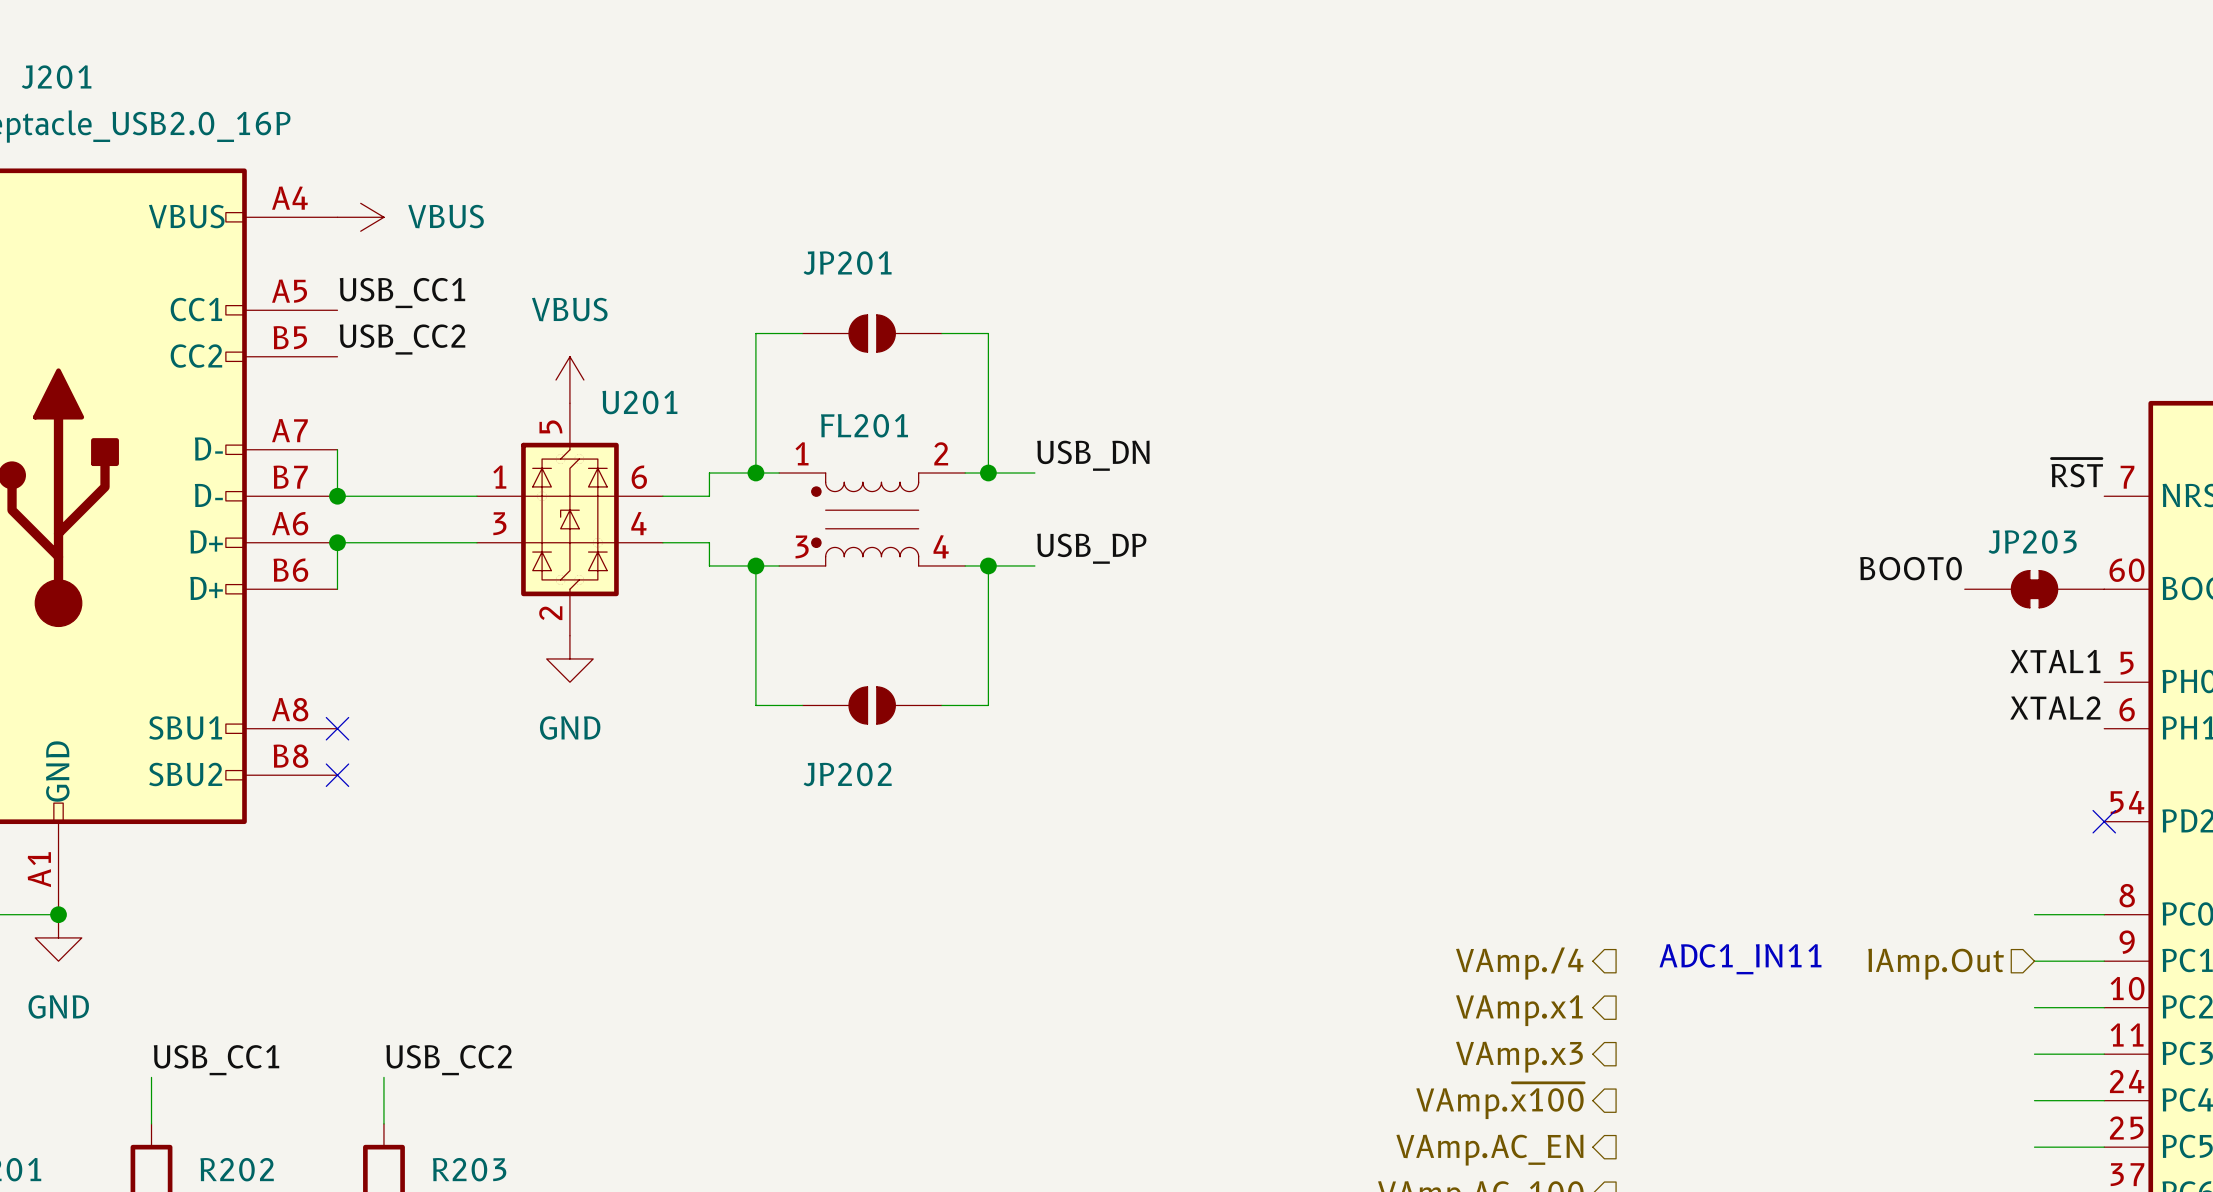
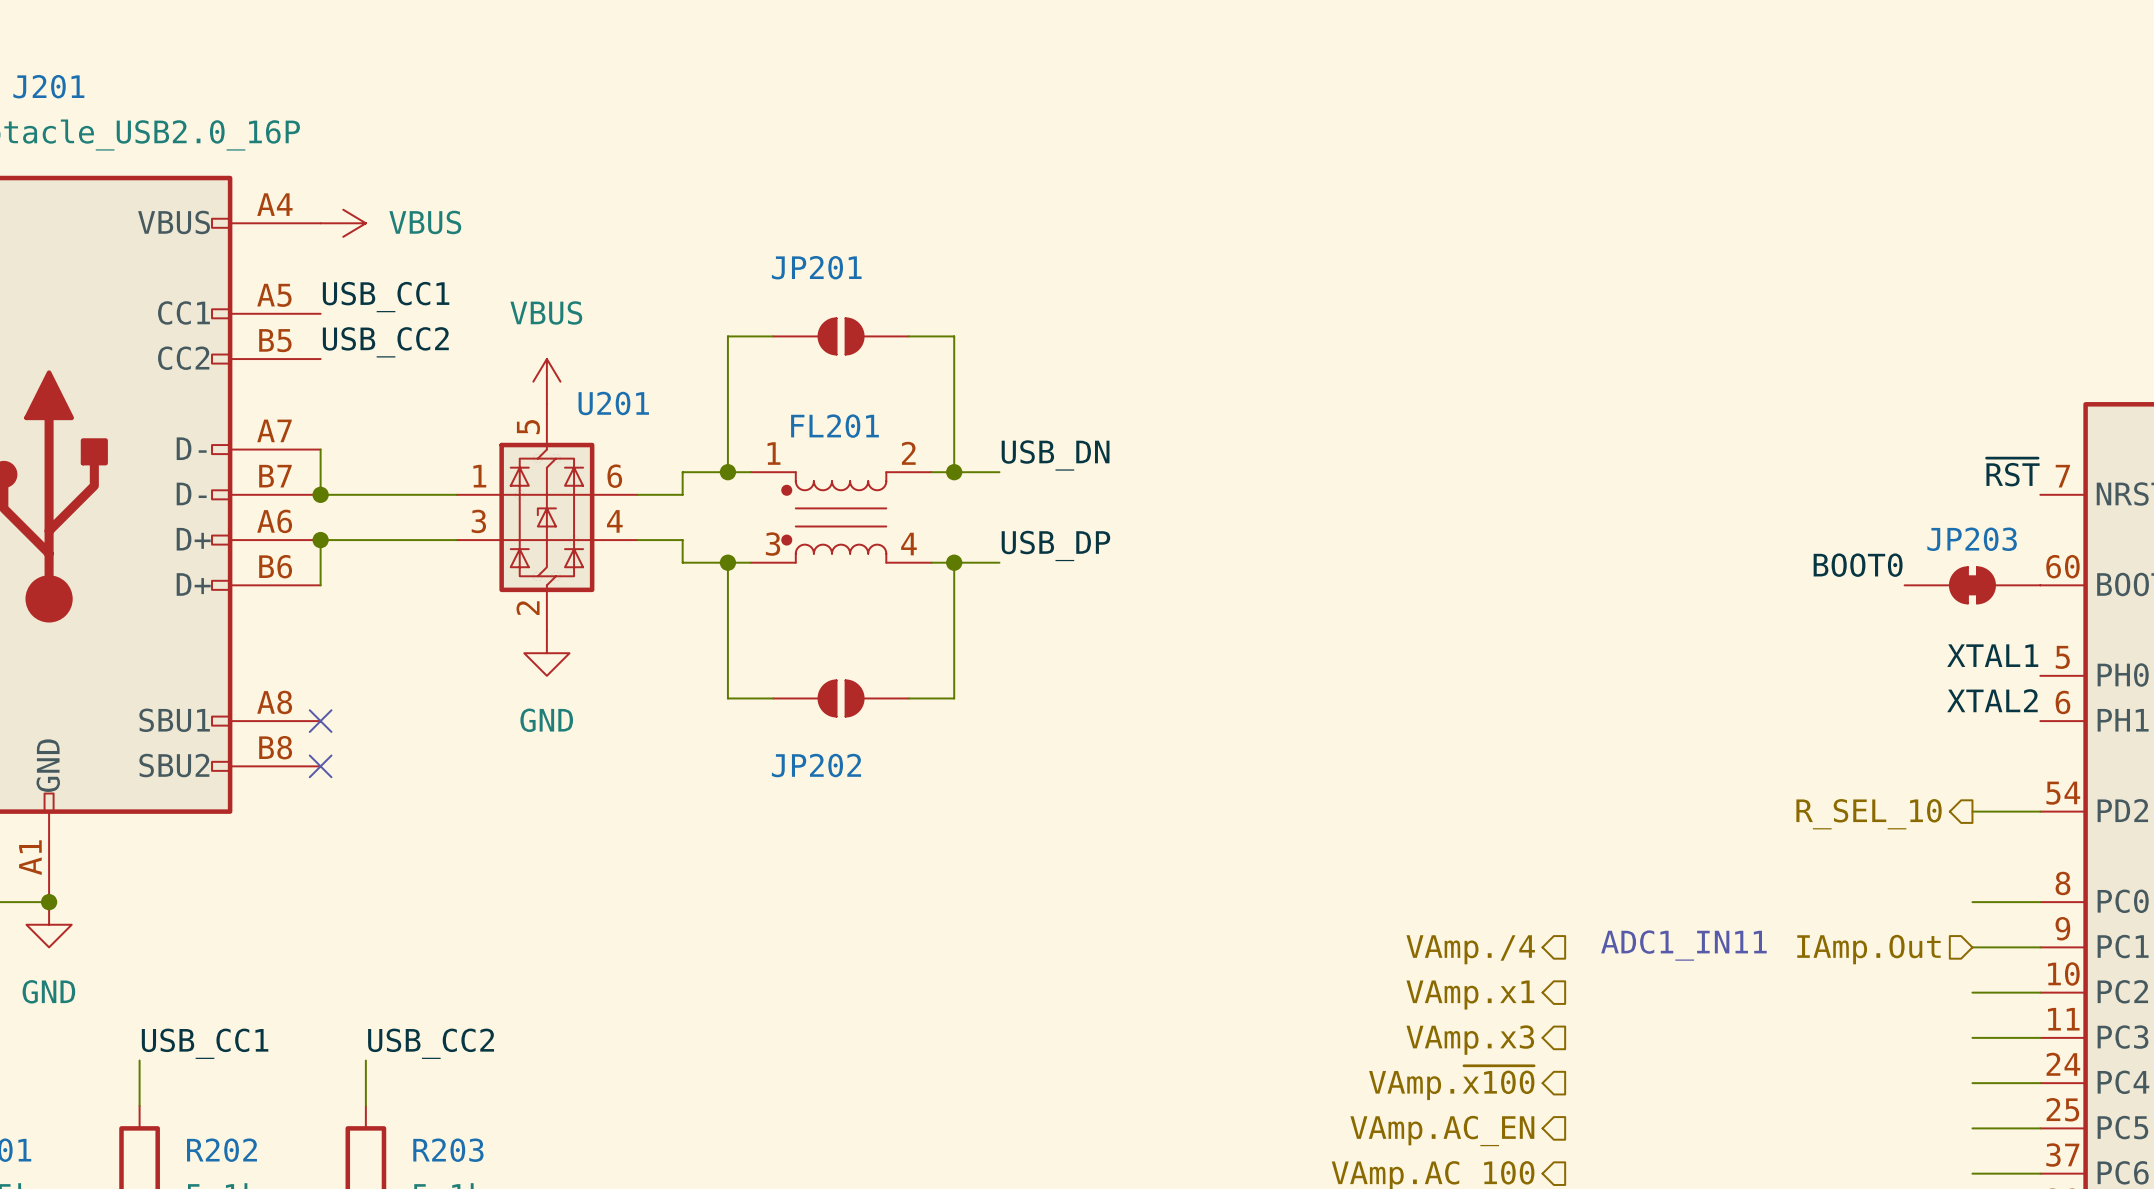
wire: none -> (1972, 811) (2040, 811)
no-connect mark: (2104, 821) -> none
hierarchical label: none -> R_SEL_10 (1869, 814)

